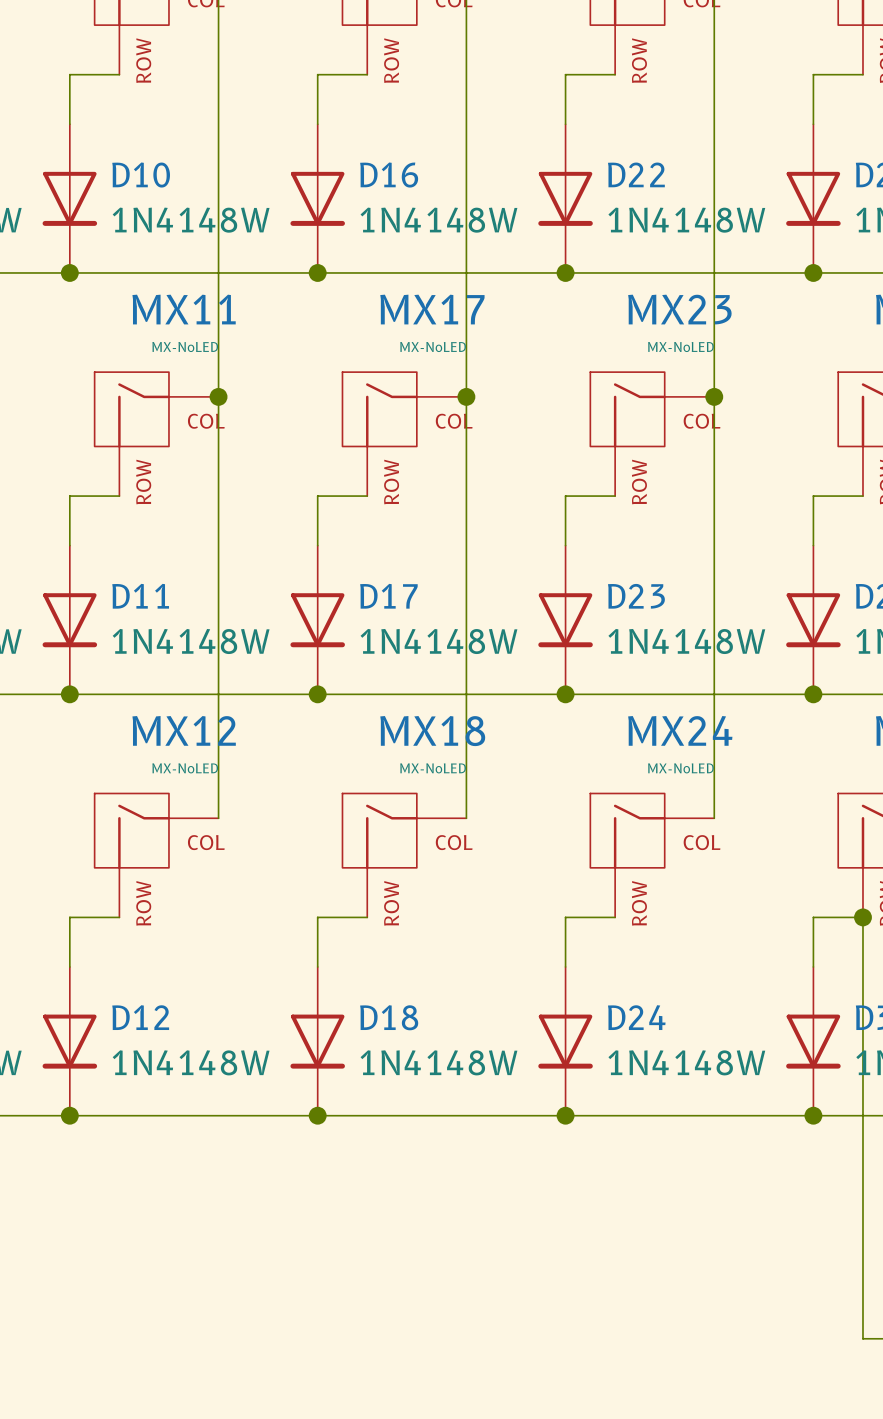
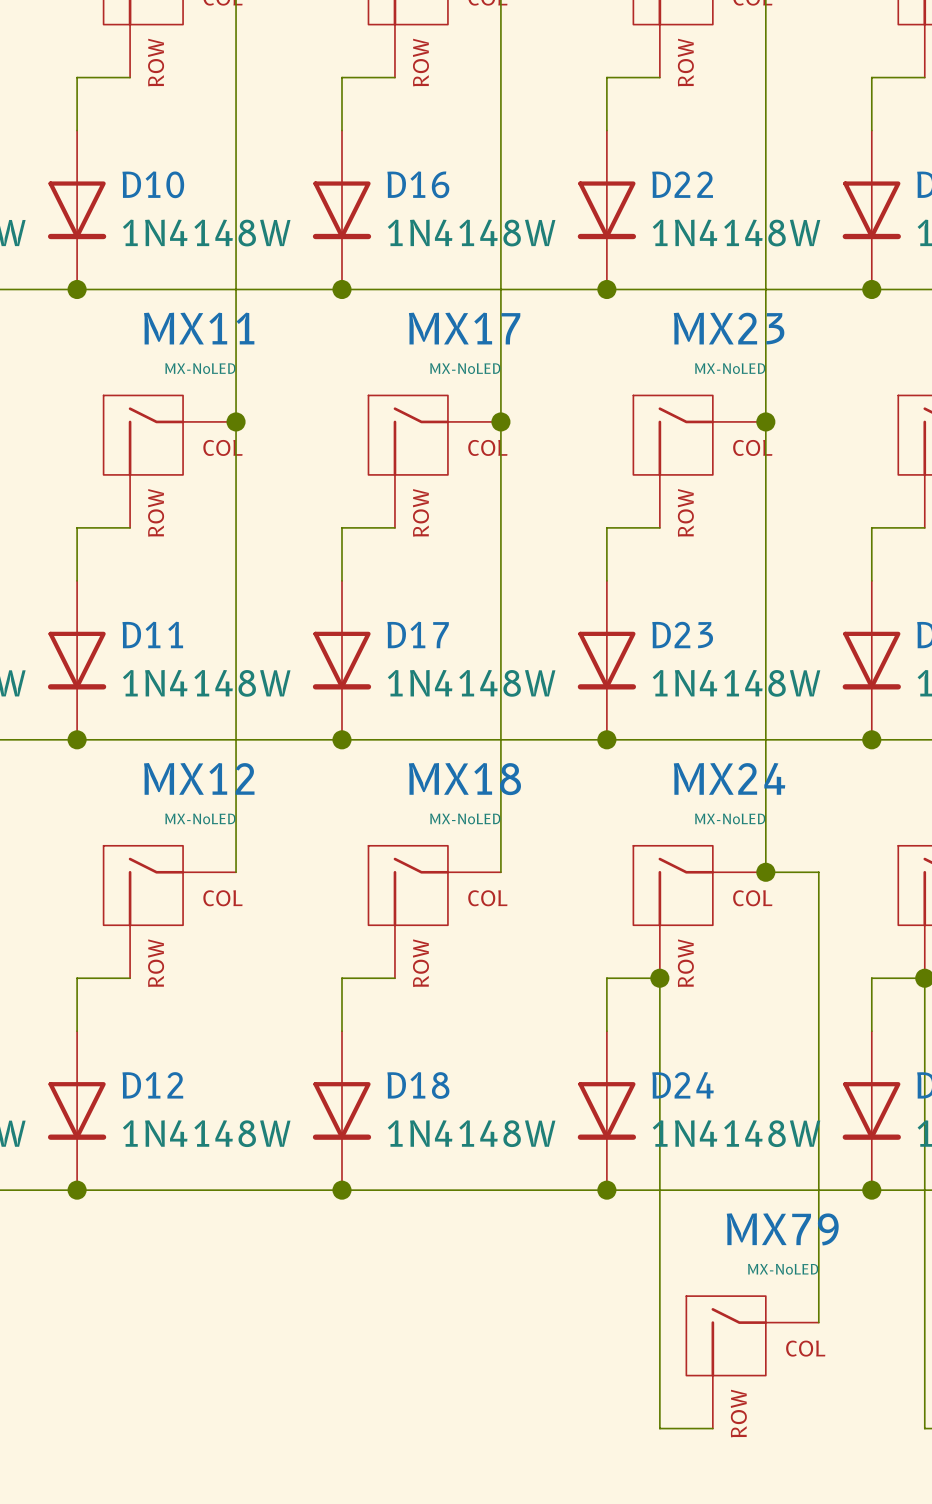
wire: none -> (765, 872) (818, 872) (818, 1322)
junction: none -> (765, 872)
wire: none -> (659, 978) (659, 1428) (712, 1428)
junction: none -> (659, 978)
MX79: none -> MX-NoLED (752, 1362)

